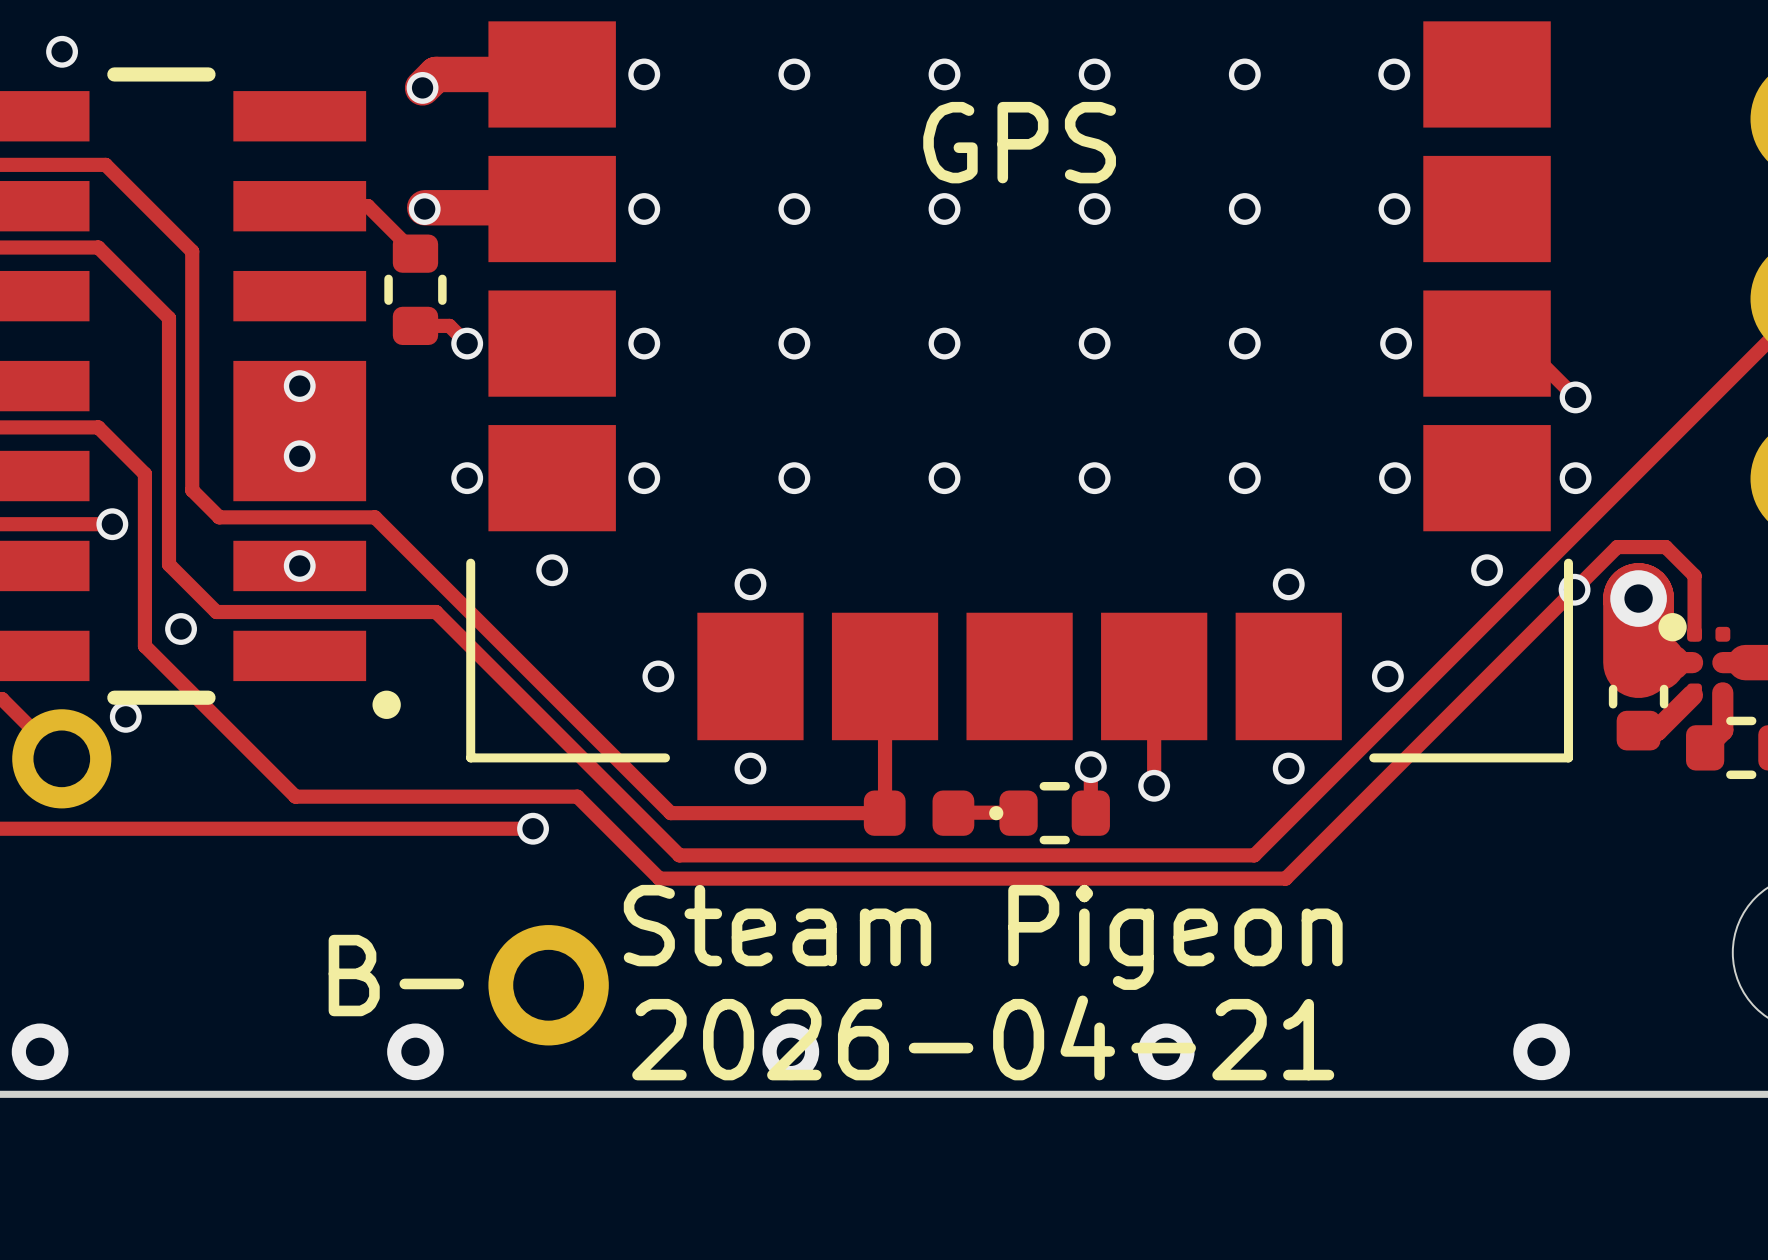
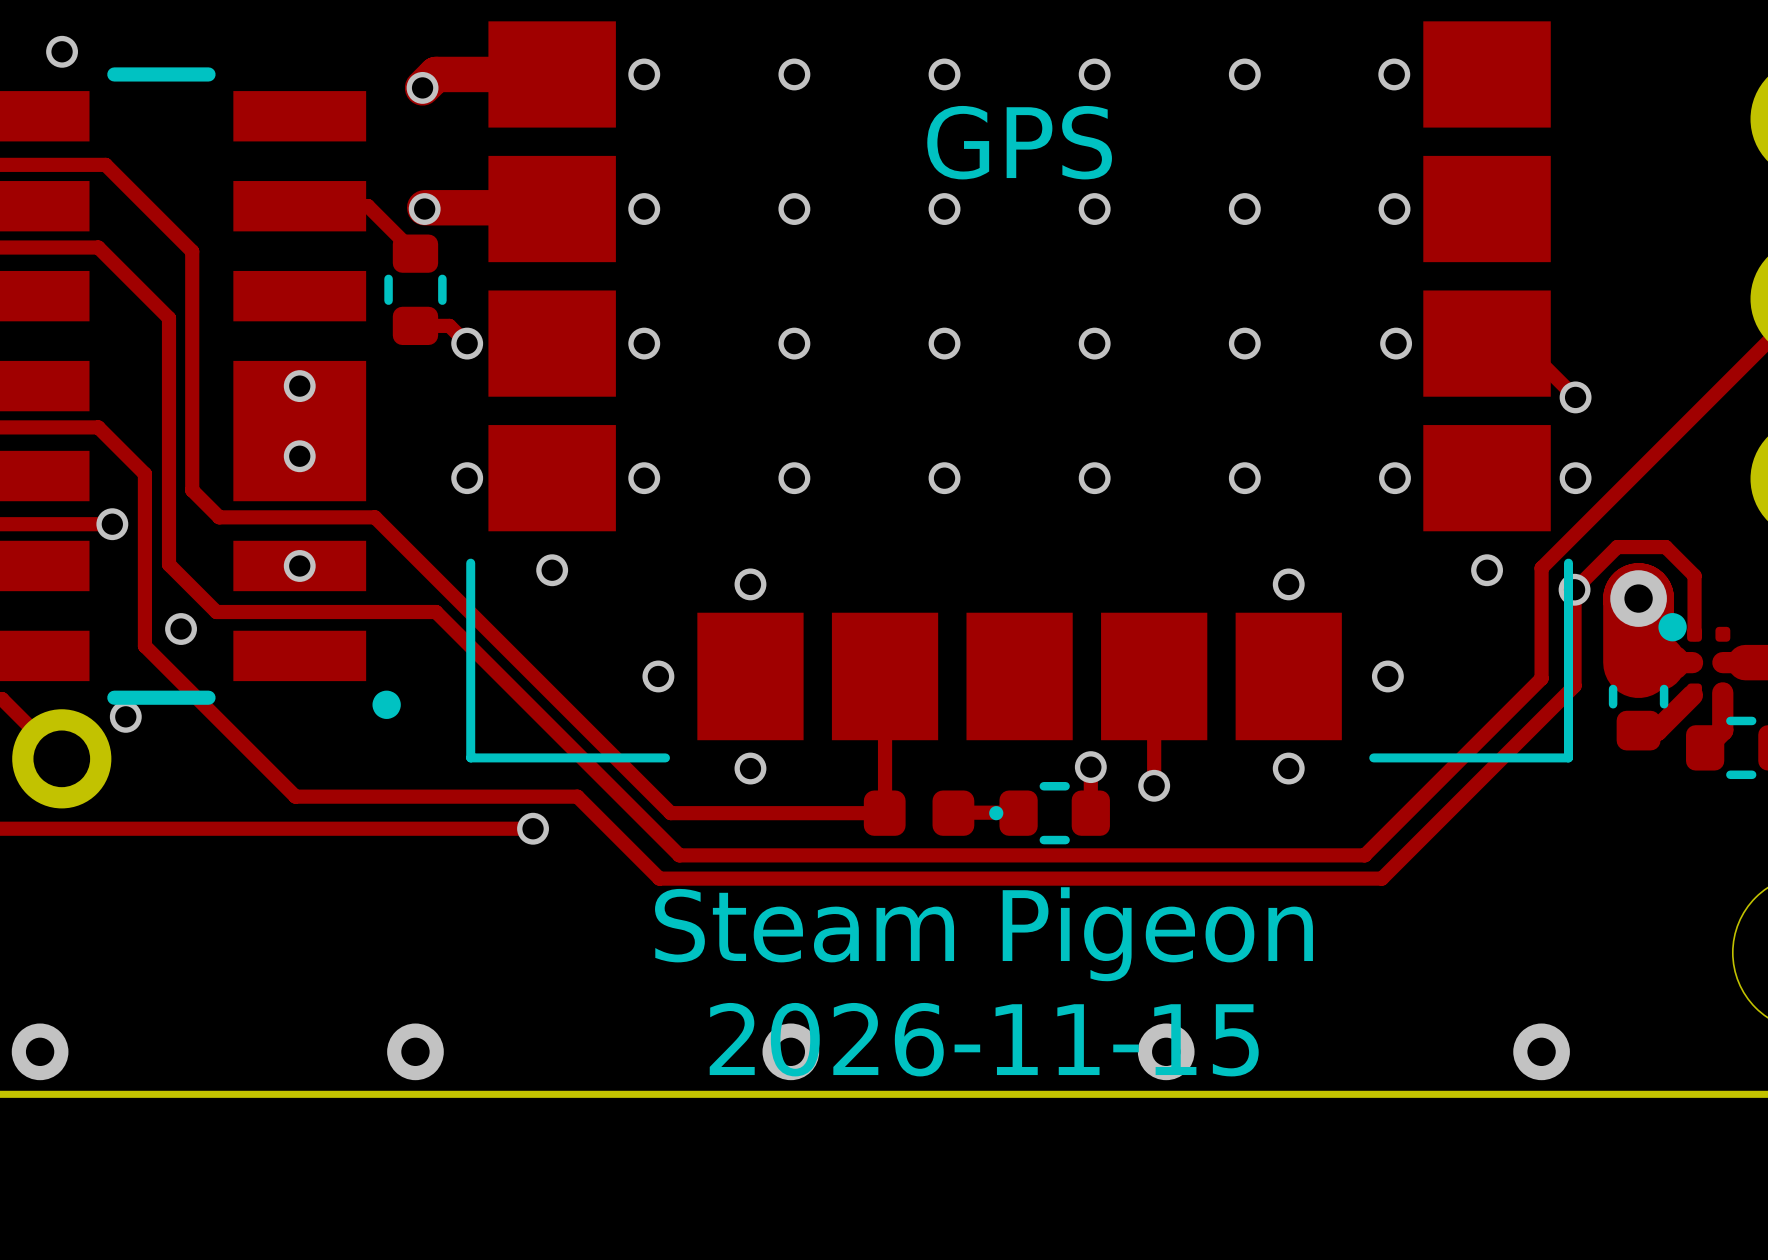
track: (1541, 568) (1254, 855) -> (1541, 568) (1541, 678) (1364, 855) (1254, 855)
track: (1574, 589) (1285, 878) -> (1574, 589) (1574, 685) (1381, 878) (1285, 878)
part: (548, 985) -> none
text: 2026-04-21 (983, 1037) -> 2026-11-15 (984, 1039)

